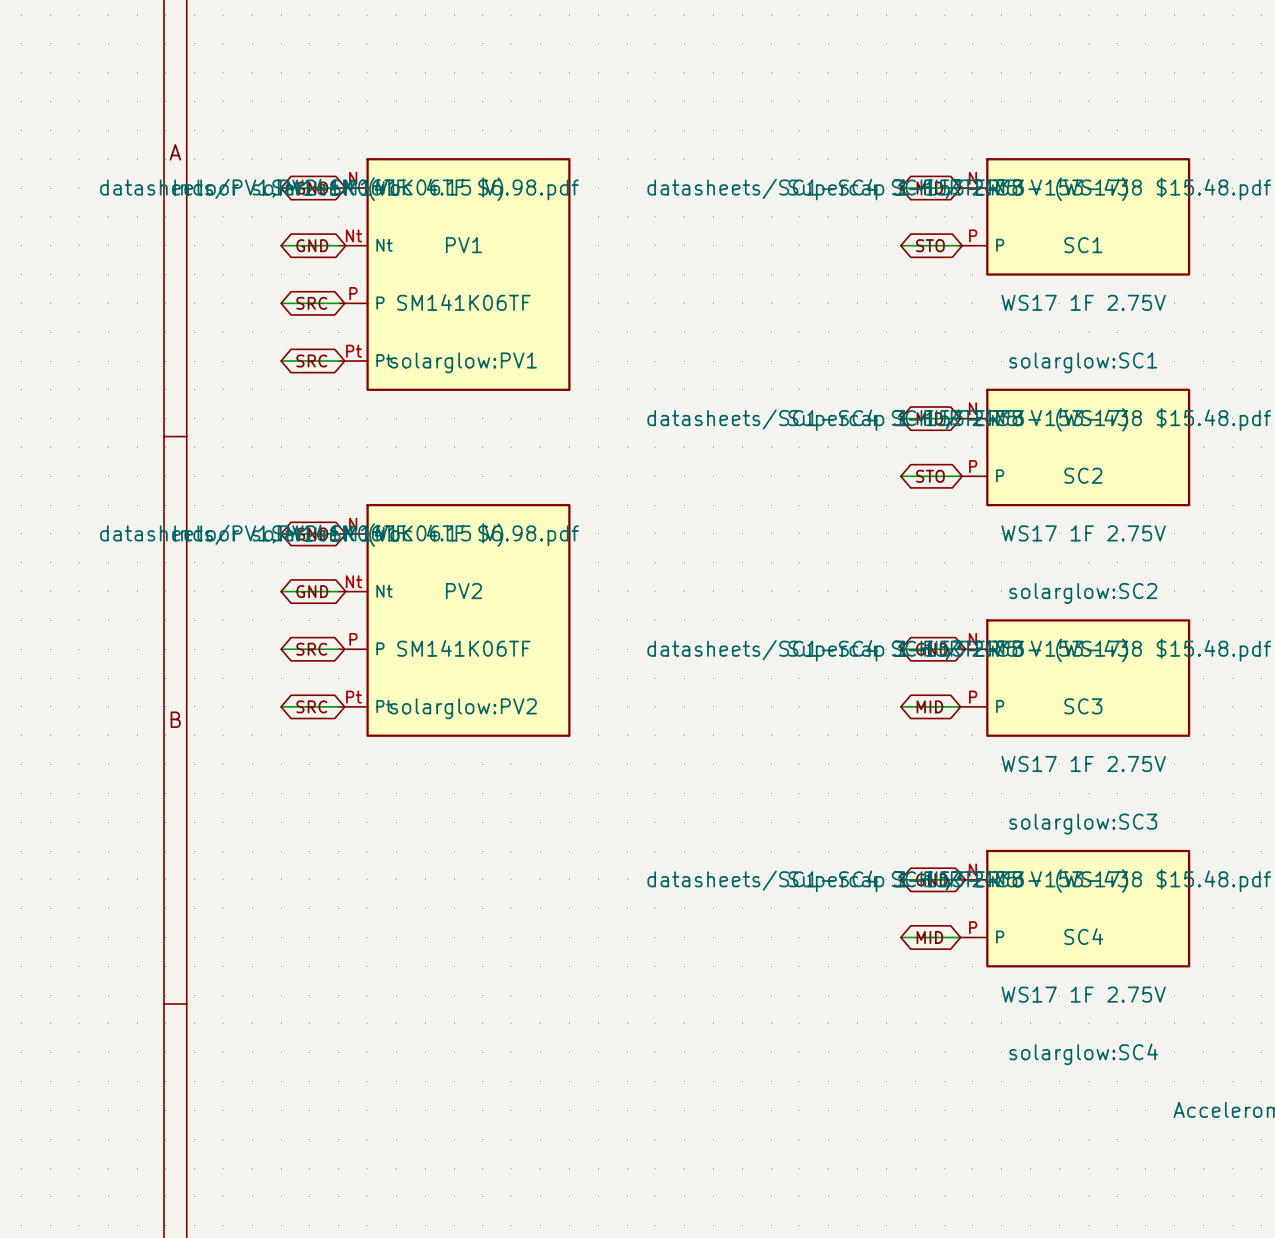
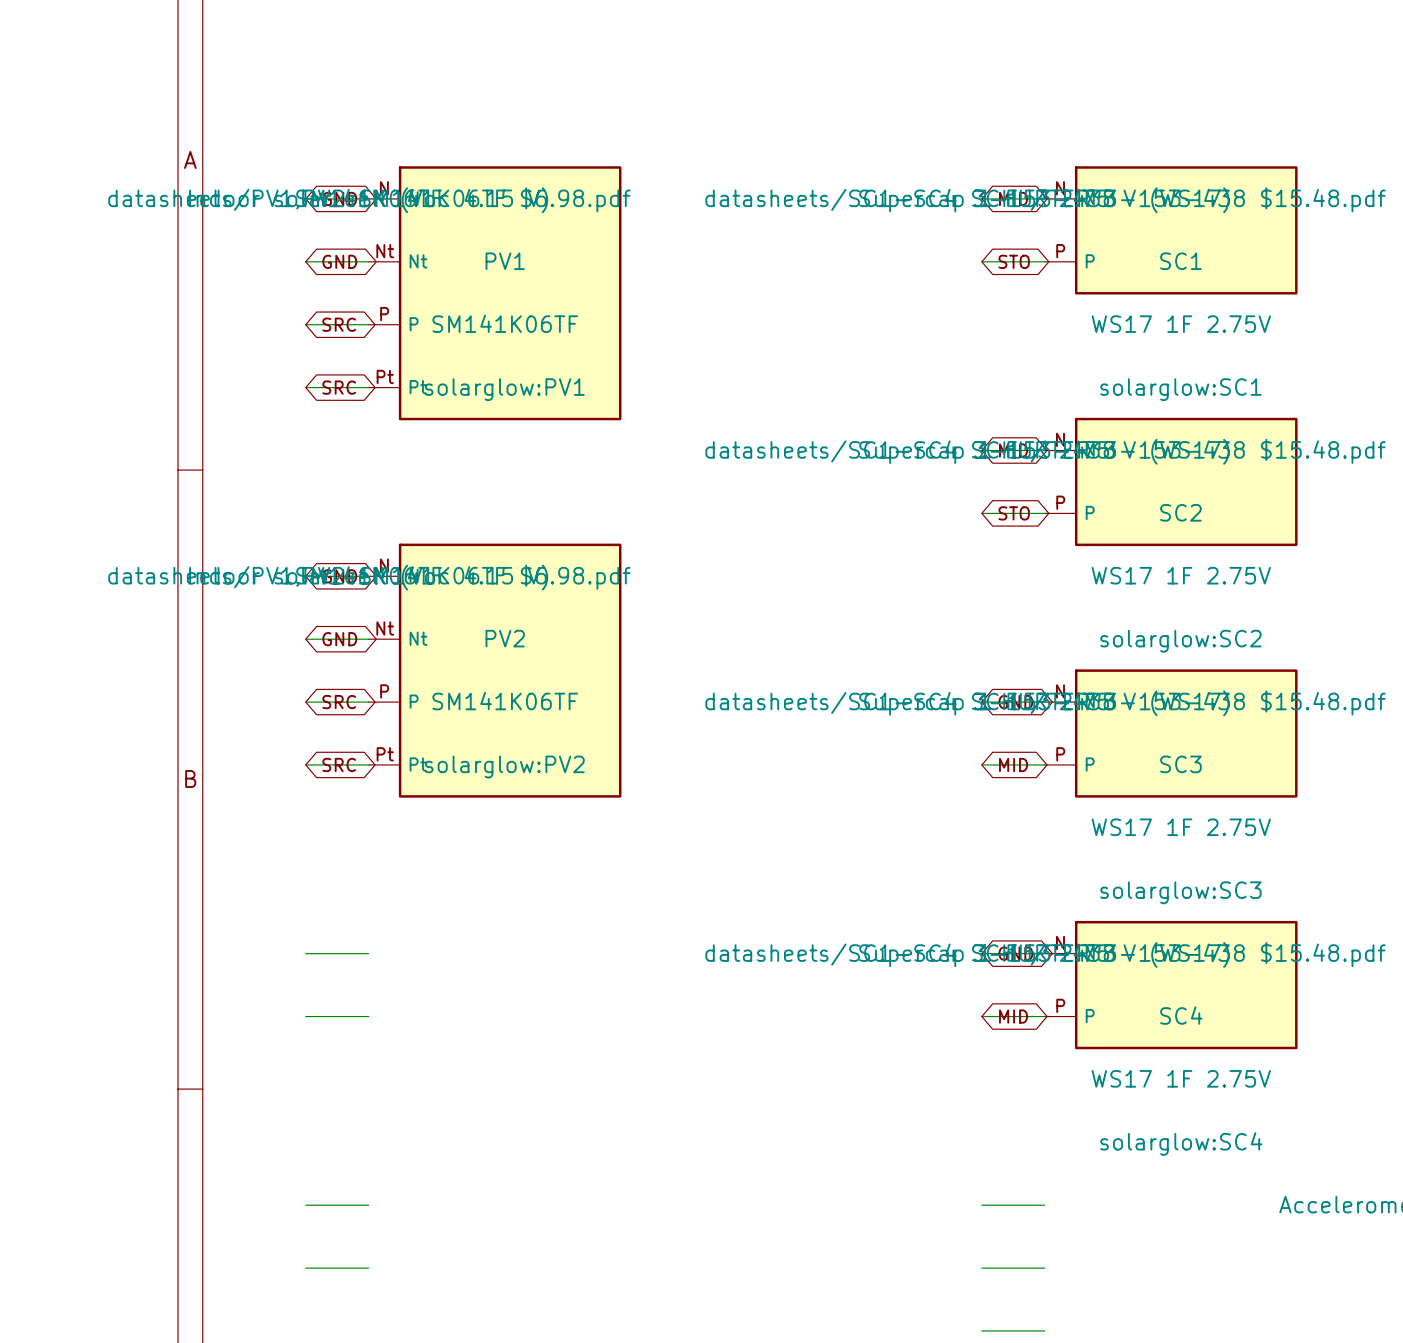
wire: none -> (305, 953) (368, 953)
wire: none -> (305, 1016) (368, 1016)
wire: none -> (305, 1205) (368, 1205)
wire: none -> (981, 1205) (1044, 1205)
wire: none -> (305, 1268) (368, 1268)
wire: none -> (981, 1268) (1044, 1268)
wire: none -> (981, 1331) (1044, 1331)

